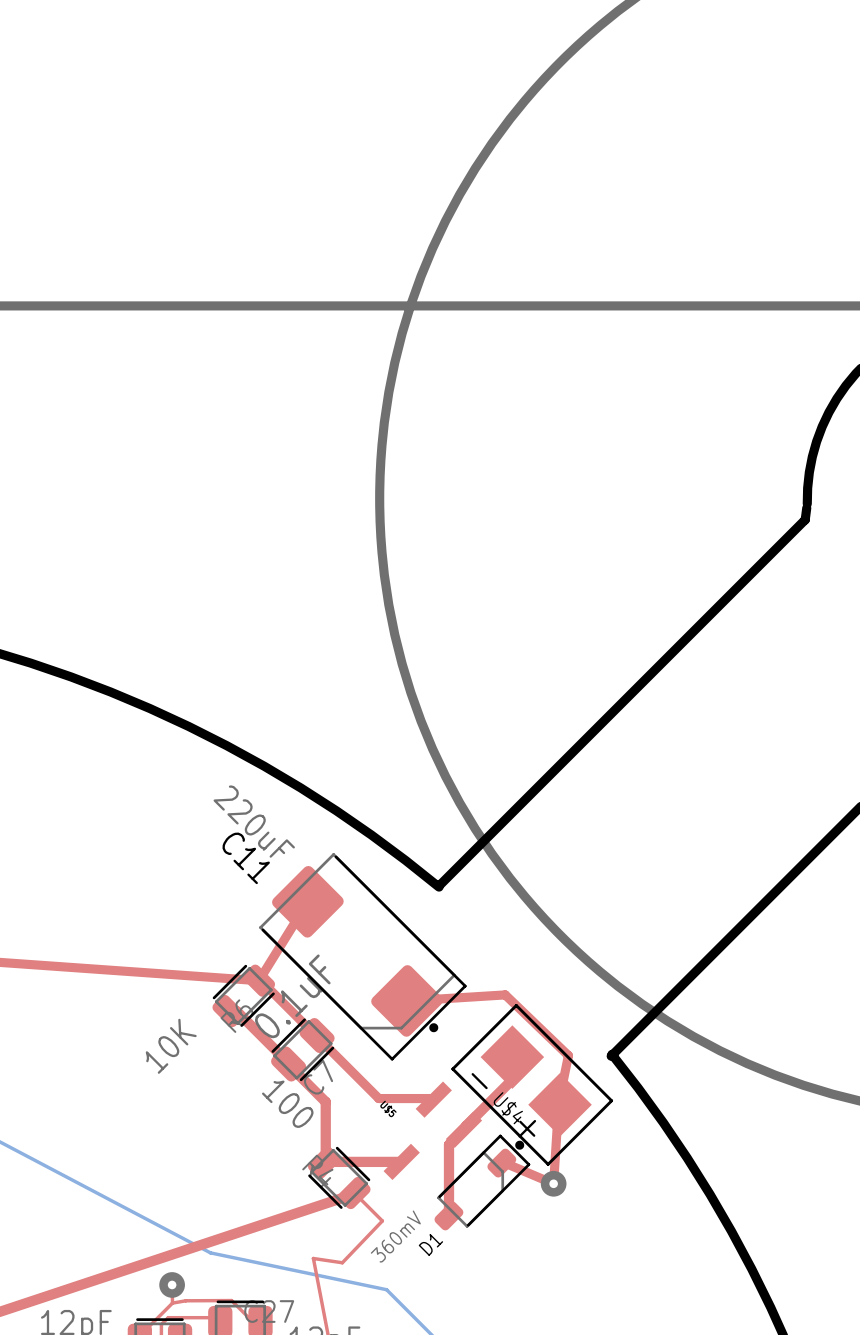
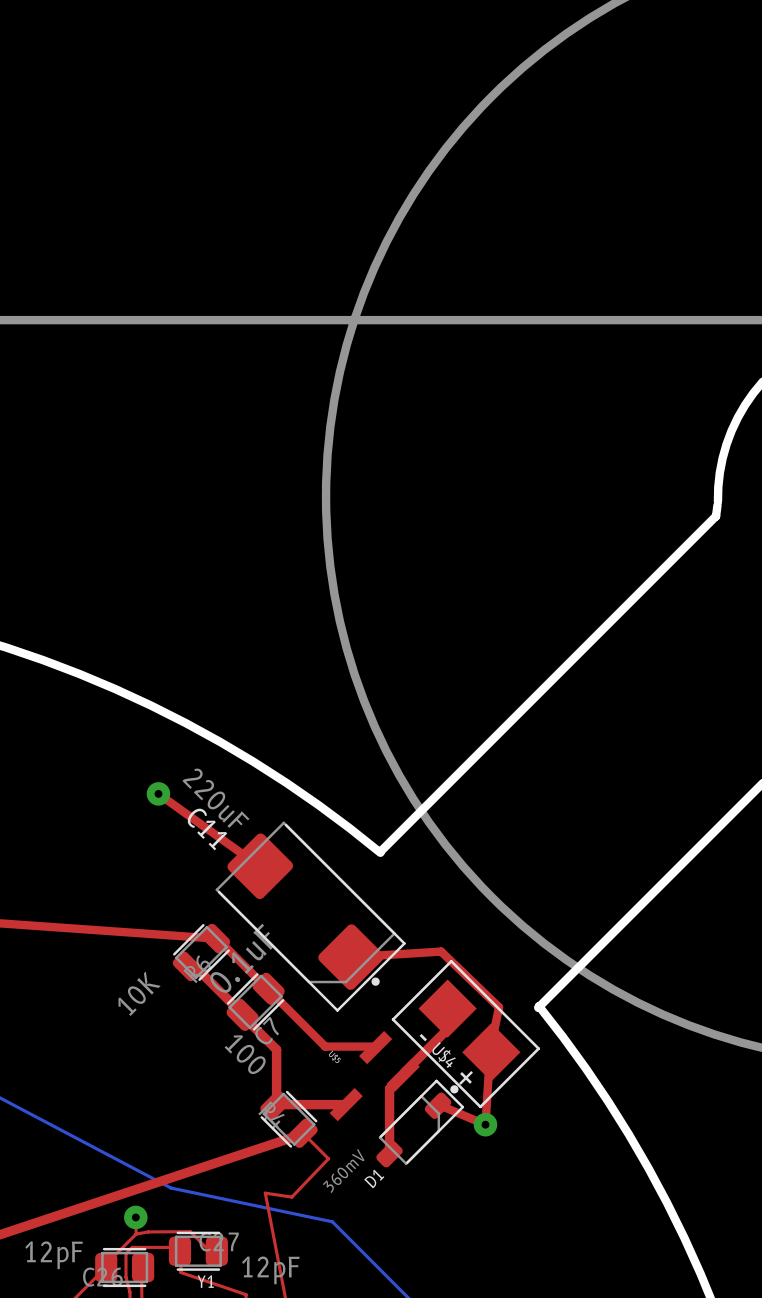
via: none -> (158, 793)
top track: (307, 901) (258, 980) -> (260, 866) (158, 793)

